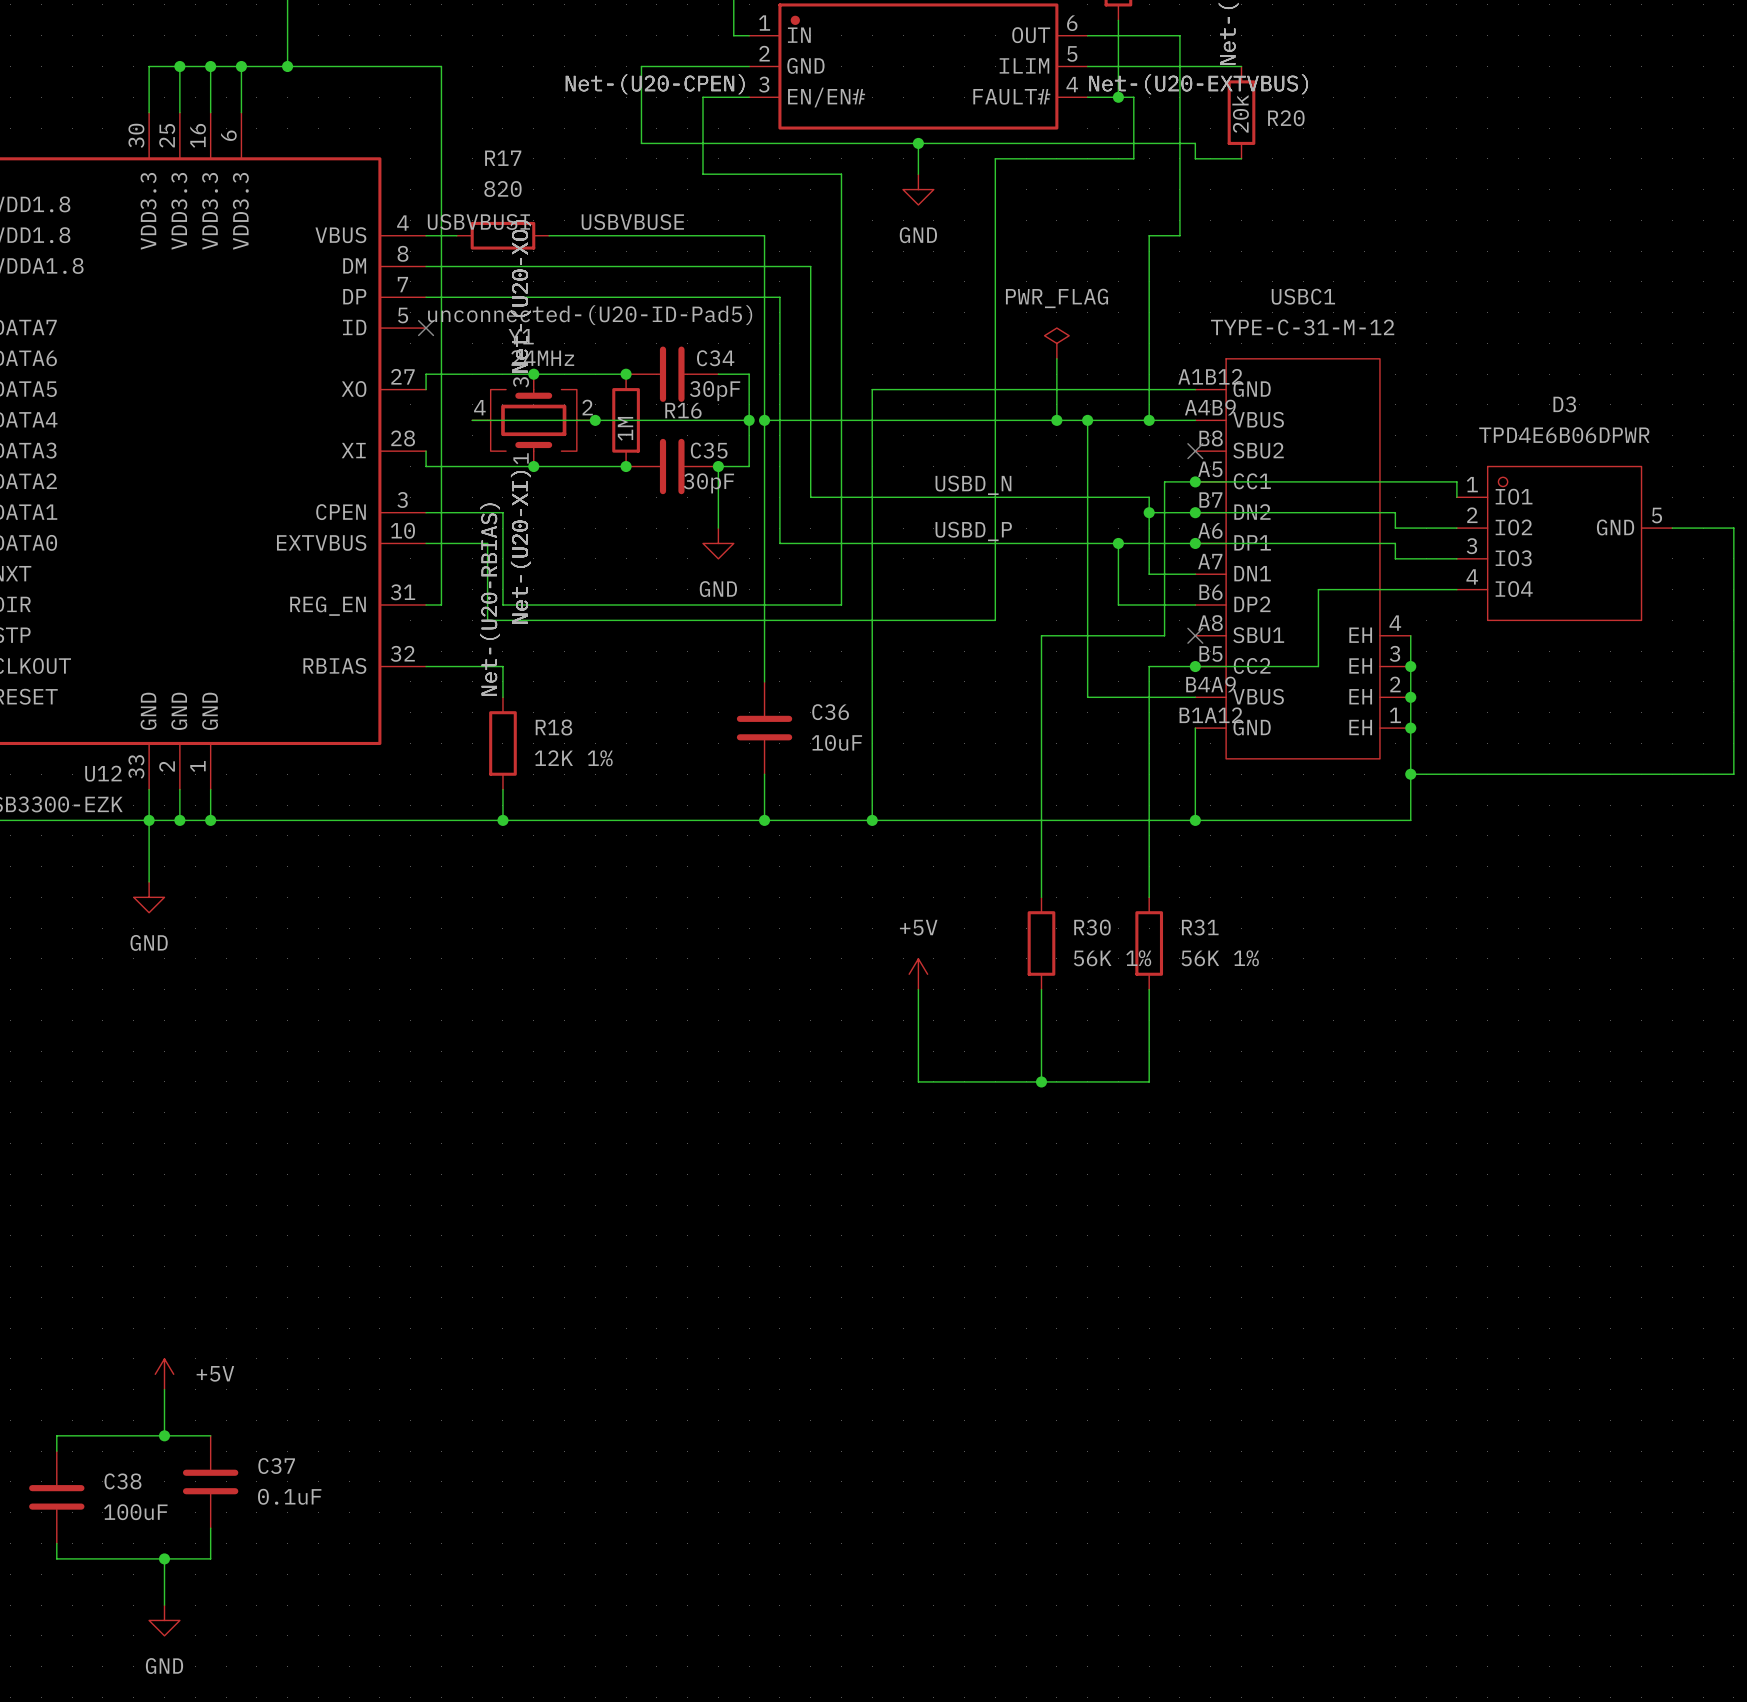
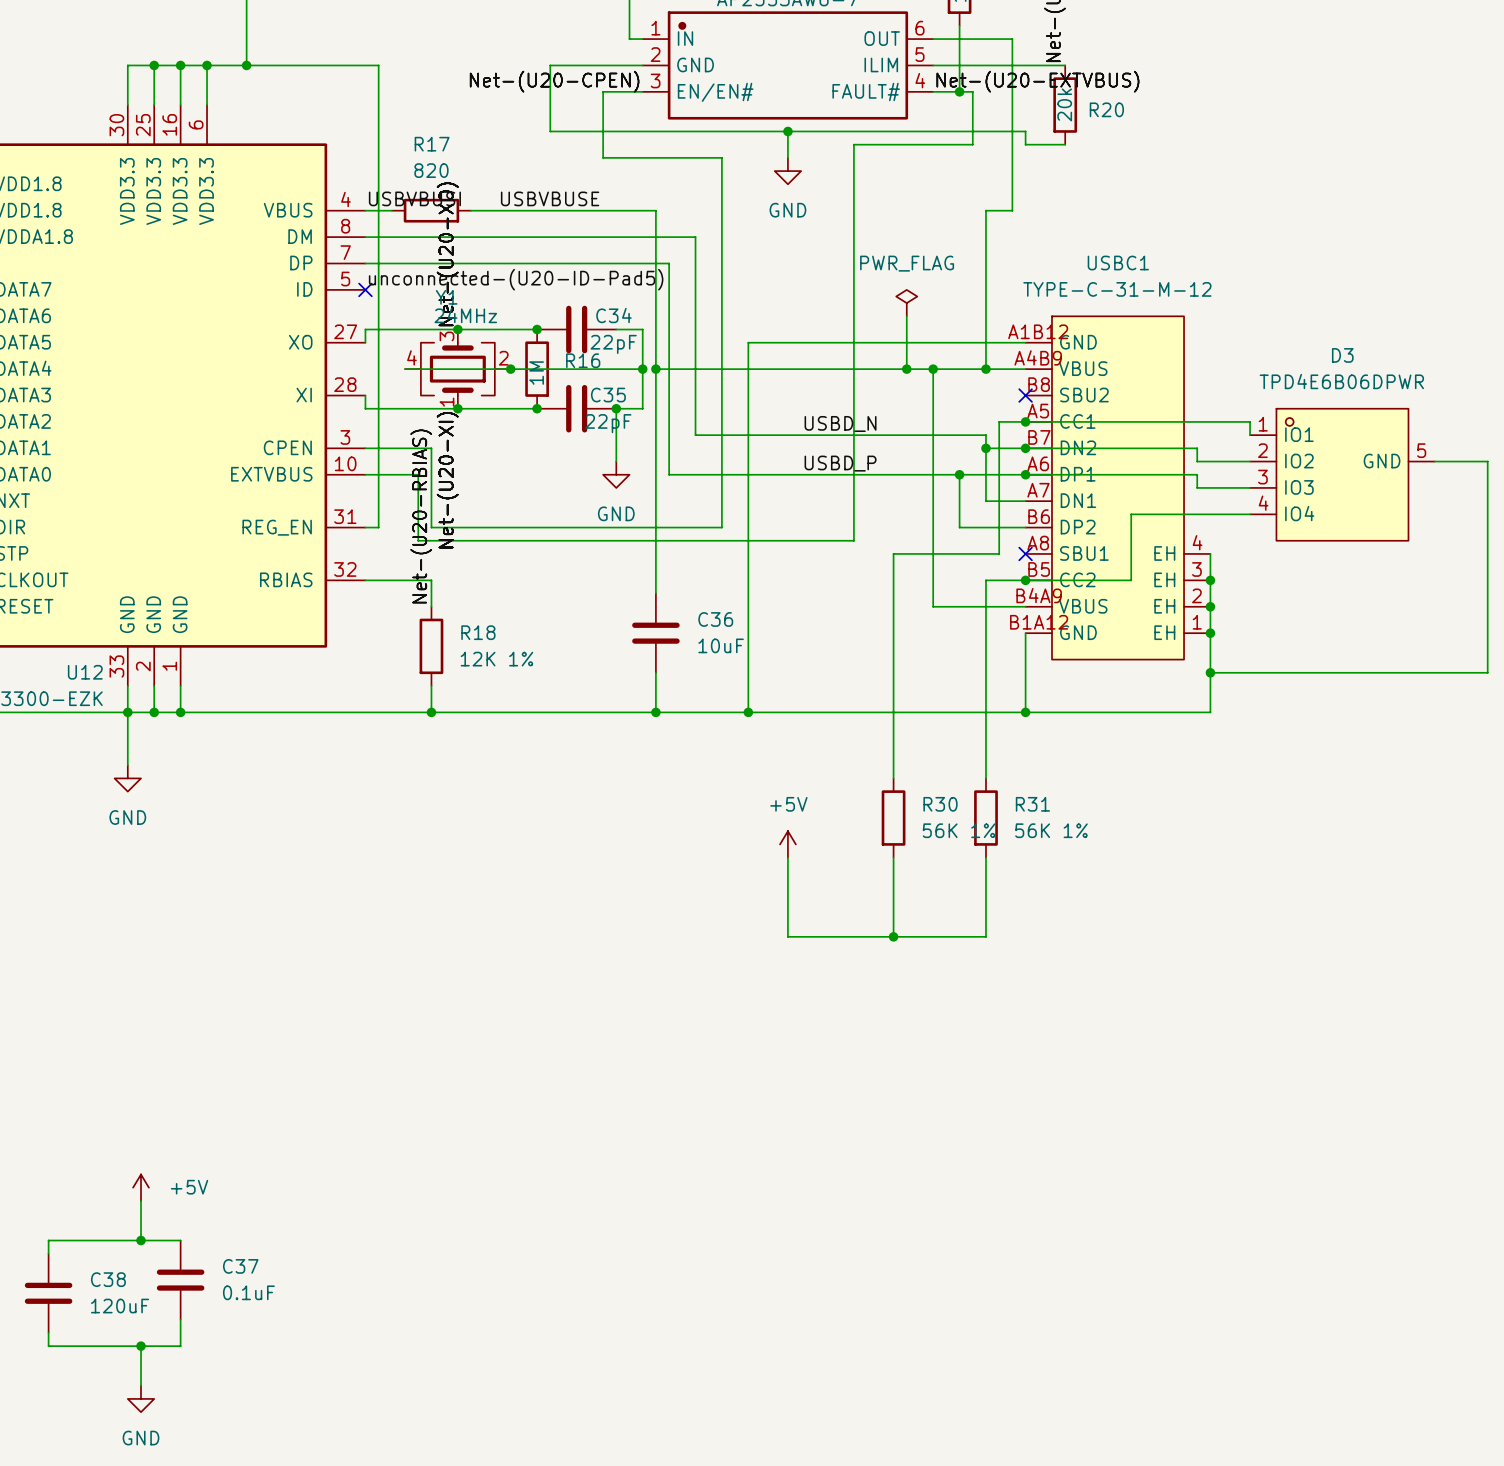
C34 value: 30pF (715, 391) -> 22pF (613, 344)
C35 value: 30pF (708, 483) -> 22pF (608, 423)
C38 value: 100uF (135, 1512) -> 120uF (120, 1306)

